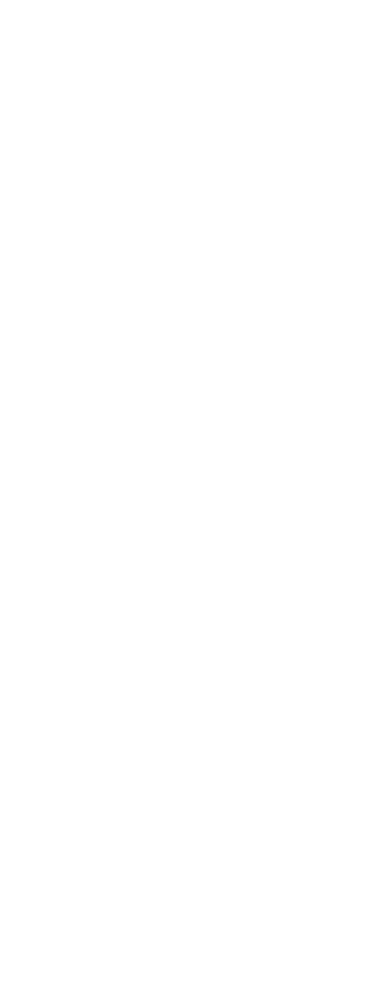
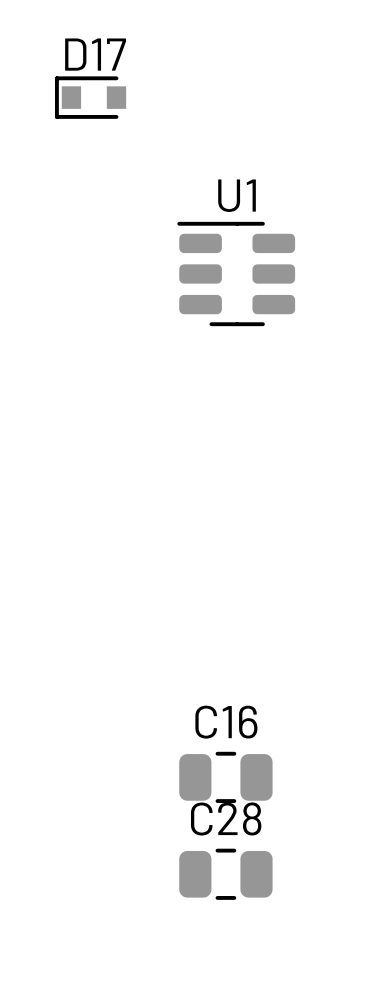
D17: none -> (90, 97)
U1: none -> (236, 274)
C16: none -> (225, 777)
C28: none -> (225, 874)

